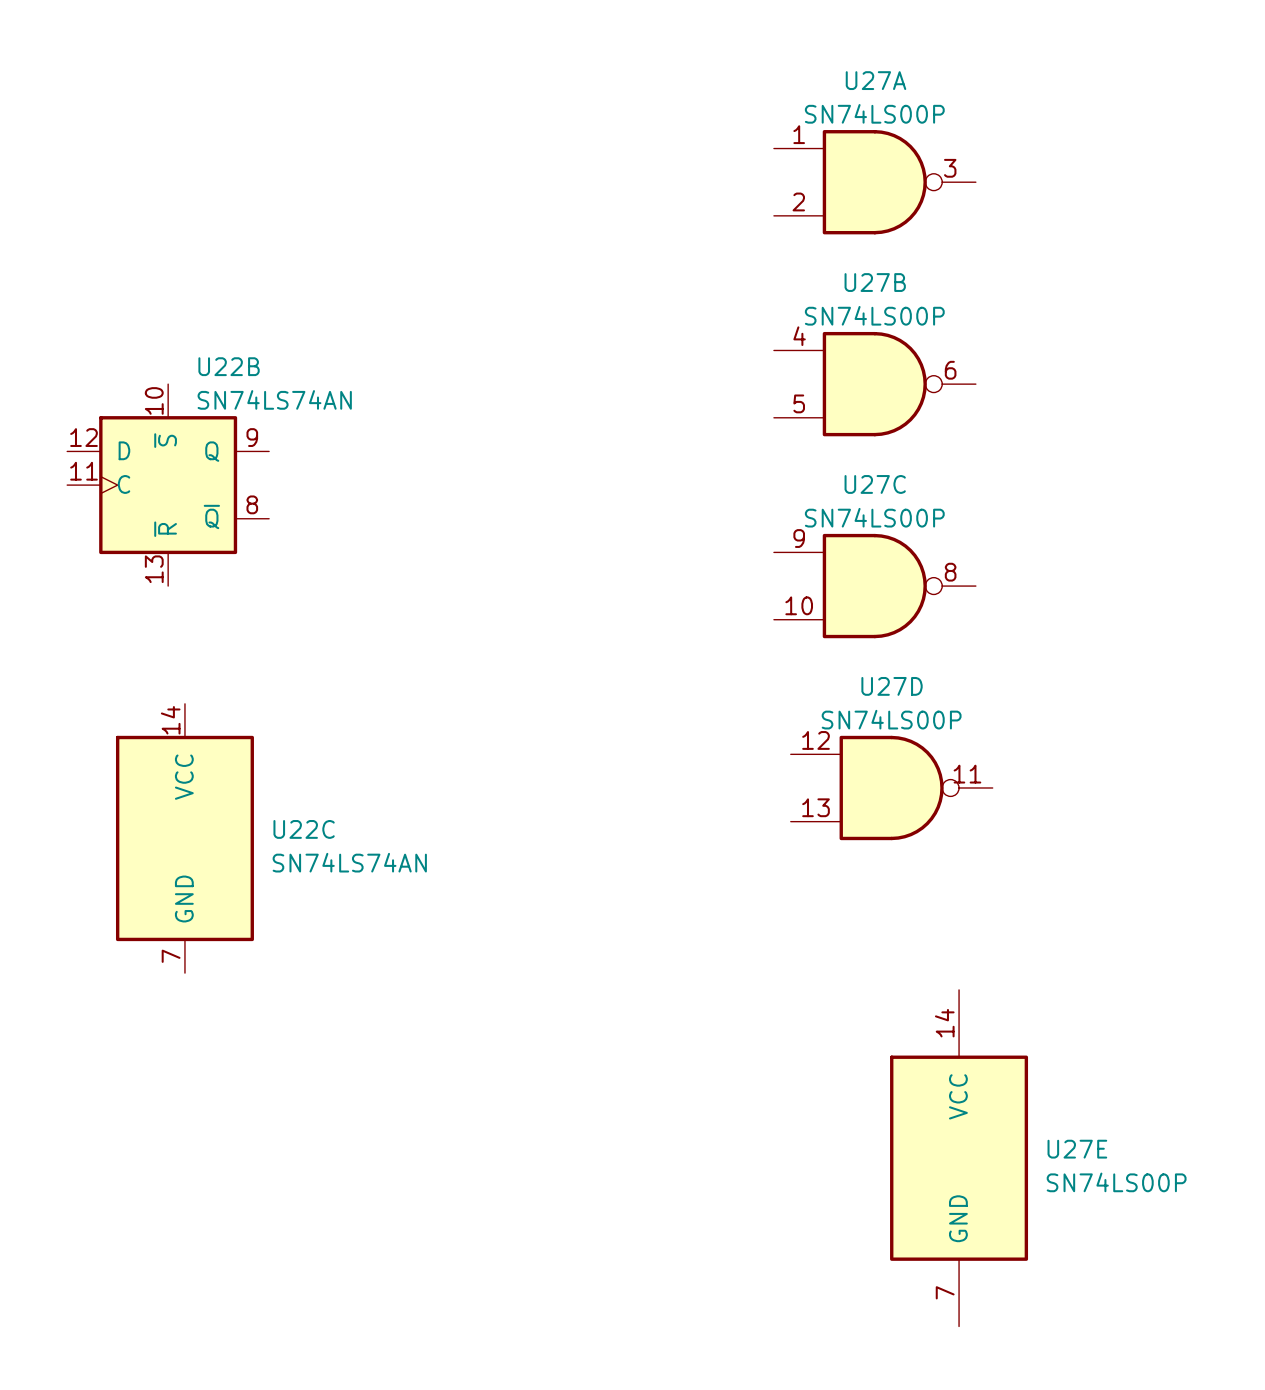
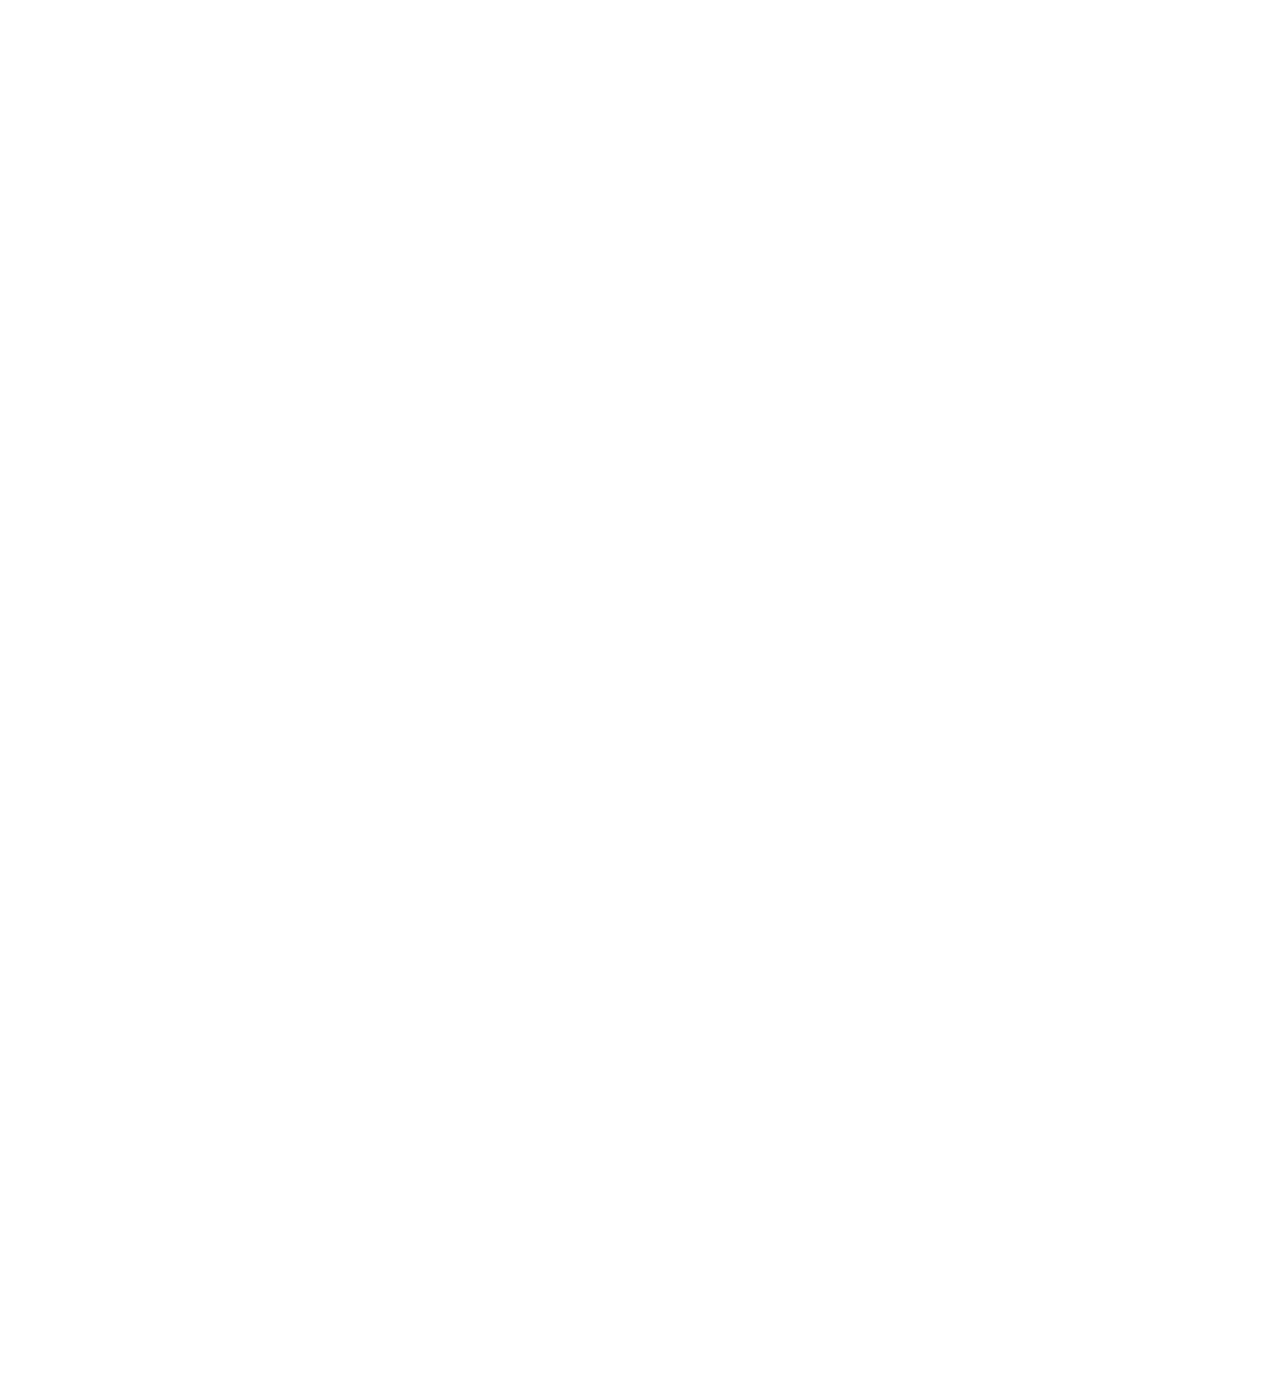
U27A: SN74LS00P (874, 182) -> none
U27B: SN74LS00P (874, 384) -> none
U22B: SN74LS74AN (168, 485) -> none
U27C: SN74LS00P (874, 586) -> none
U27D: SN74LS00P (891, 787) -> none
U22C: SN74LS74AN (184, 838) -> none
U27E: SN74LS00P (959, 1158) -> none

